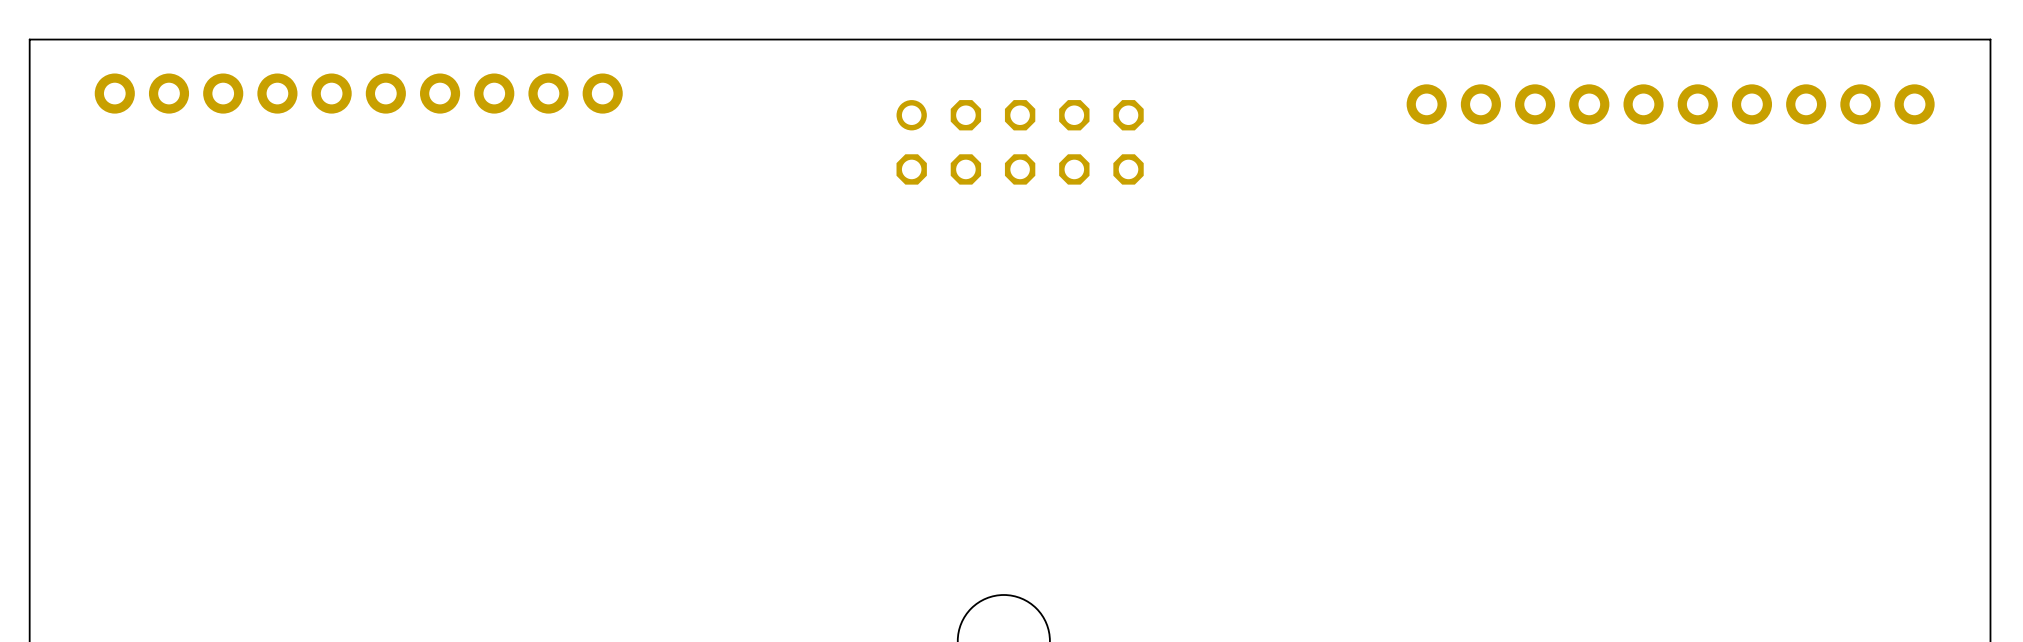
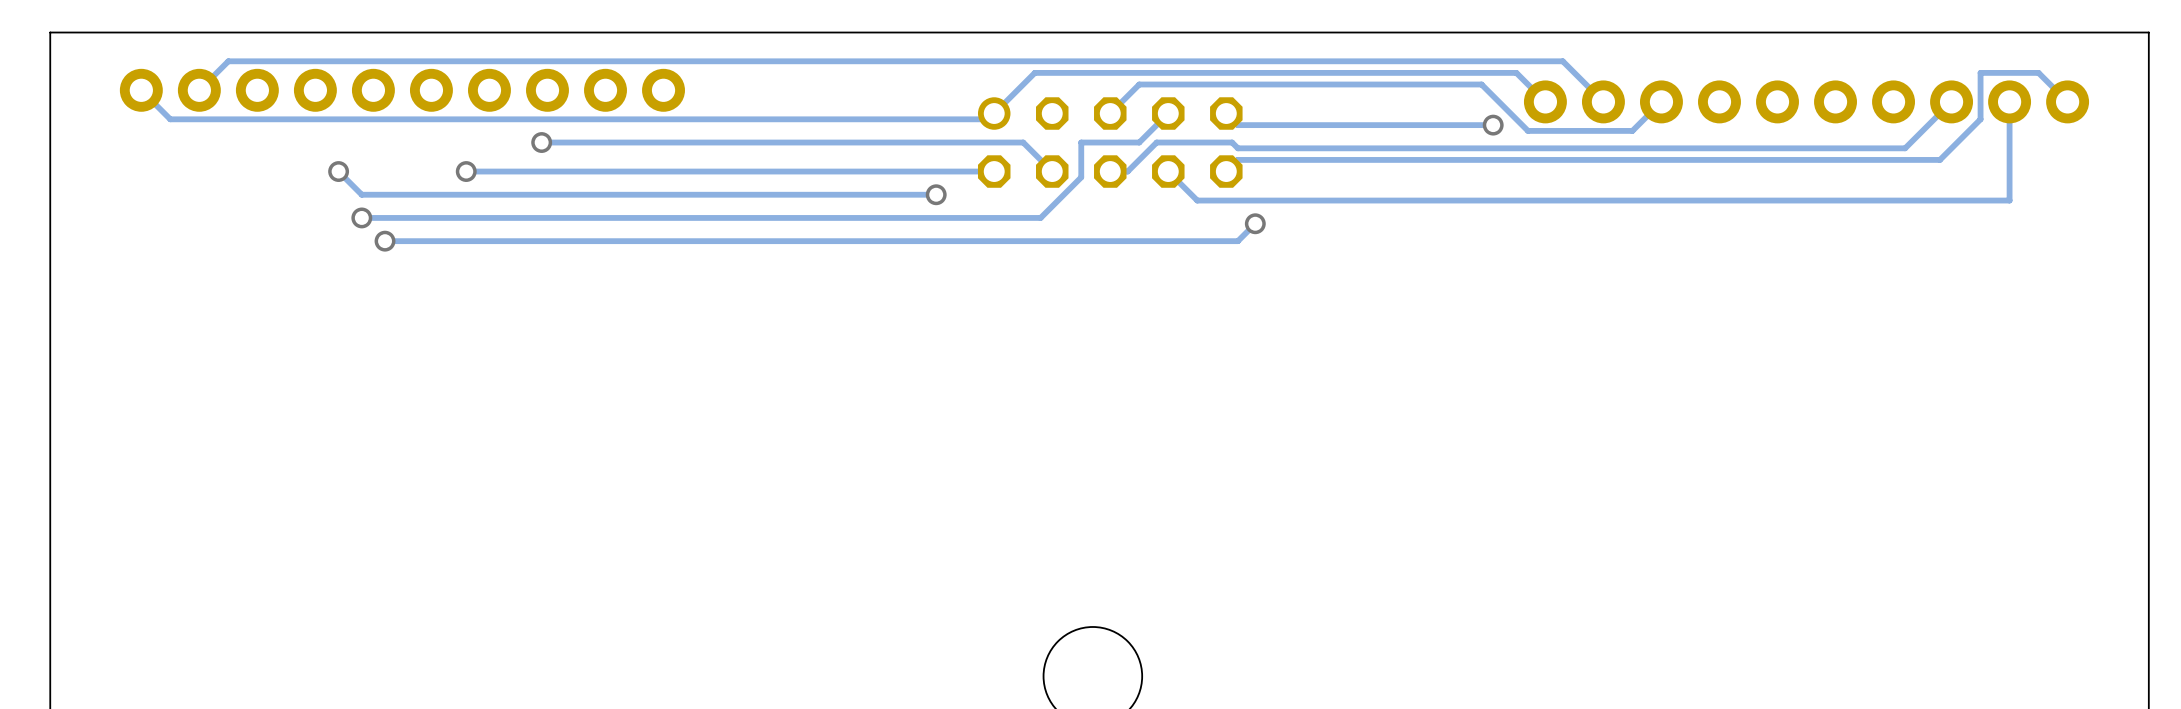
track: none -> (141, 90) (170, 119) (988, 119) (1034, 72) (1516, 72) (1545, 101)
track: none -> (199, 90) (228, 61) (1562, 61) (1603, 101)
track: none -> (1661, 101) (1632, 130) (1528, 130) (1481, 84) (1139, 84) (1110, 113)
track: none -> (1951, 101) (1905, 148) (1237, 148) (1232, 142) (1156, 142) (1127, 171) (1110, 171)
track: none -> (2009, 101) (2009, 200) (1197, 200) (1168, 171)
track: none -> (2067, 101) (2038, 72) (1980, 72) (1980, 119) (1939, 159) (1237, 159) (1226, 171)
track: none -> (1168, 113) (1139, 142) (1081, 142) (1081, 177) (1040, 217) (361, 217)
track: none -> (1226, 113) (1237, 125) (1493, 125)
via: none -> (1493, 125)
track: none -> (541, 142) (1023, 142) (1052, 171)
via: none -> (541, 142)
track: none -> (338, 171) (361, 194) (936, 194)
via: none -> (338, 171)
via: none -> (466, 171)
track: none -> (994, 171) (466, 171)
via: none -> (936, 194)
via: none -> (361, 217)
track: none -> (1255, 223) (1237, 241) (385, 241)
via: none -> (1255, 223)
via: none -> (385, 241)

